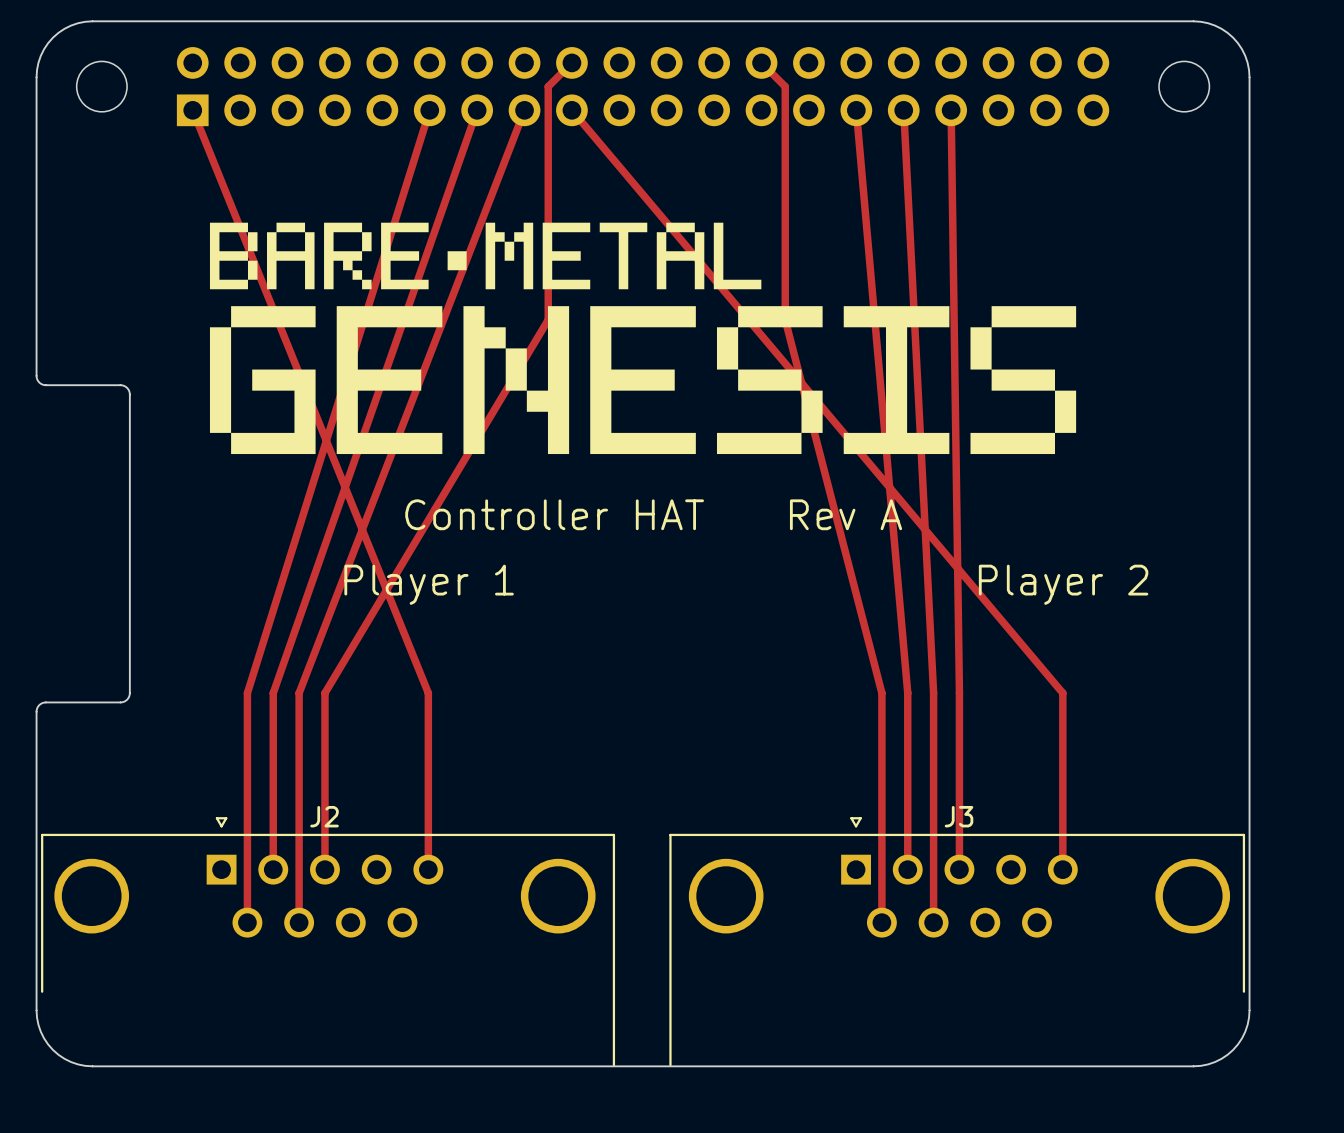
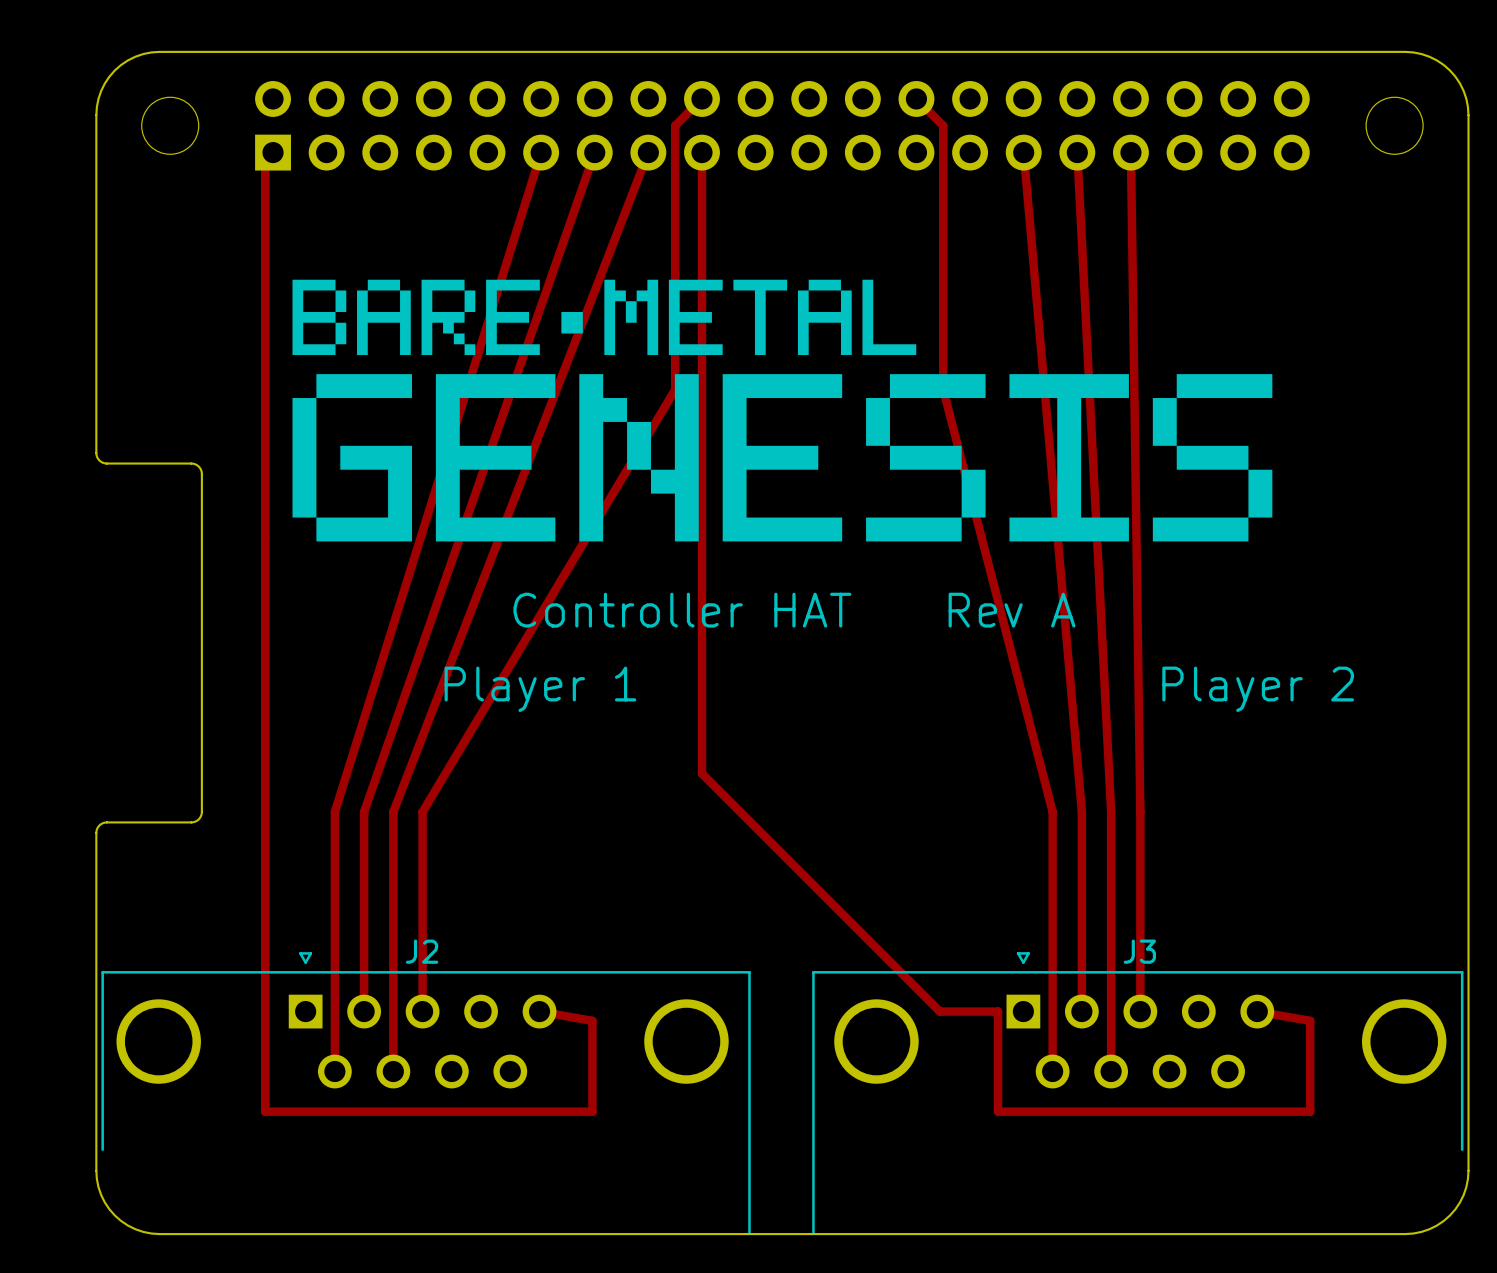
track: (192, 110) (428, 693) (428, 869) -> (273, 152) (265, 160) (265, 1111) (592, 1111) (592, 1020) (539, 1011)
track: (571, 110) (1062, 693) (1062, 869) -> (701, 152) (701, 773) (939, 1011) (998, 1011) (998, 1111) (1310, 1111) (1310, 1020) (1257, 1011)

